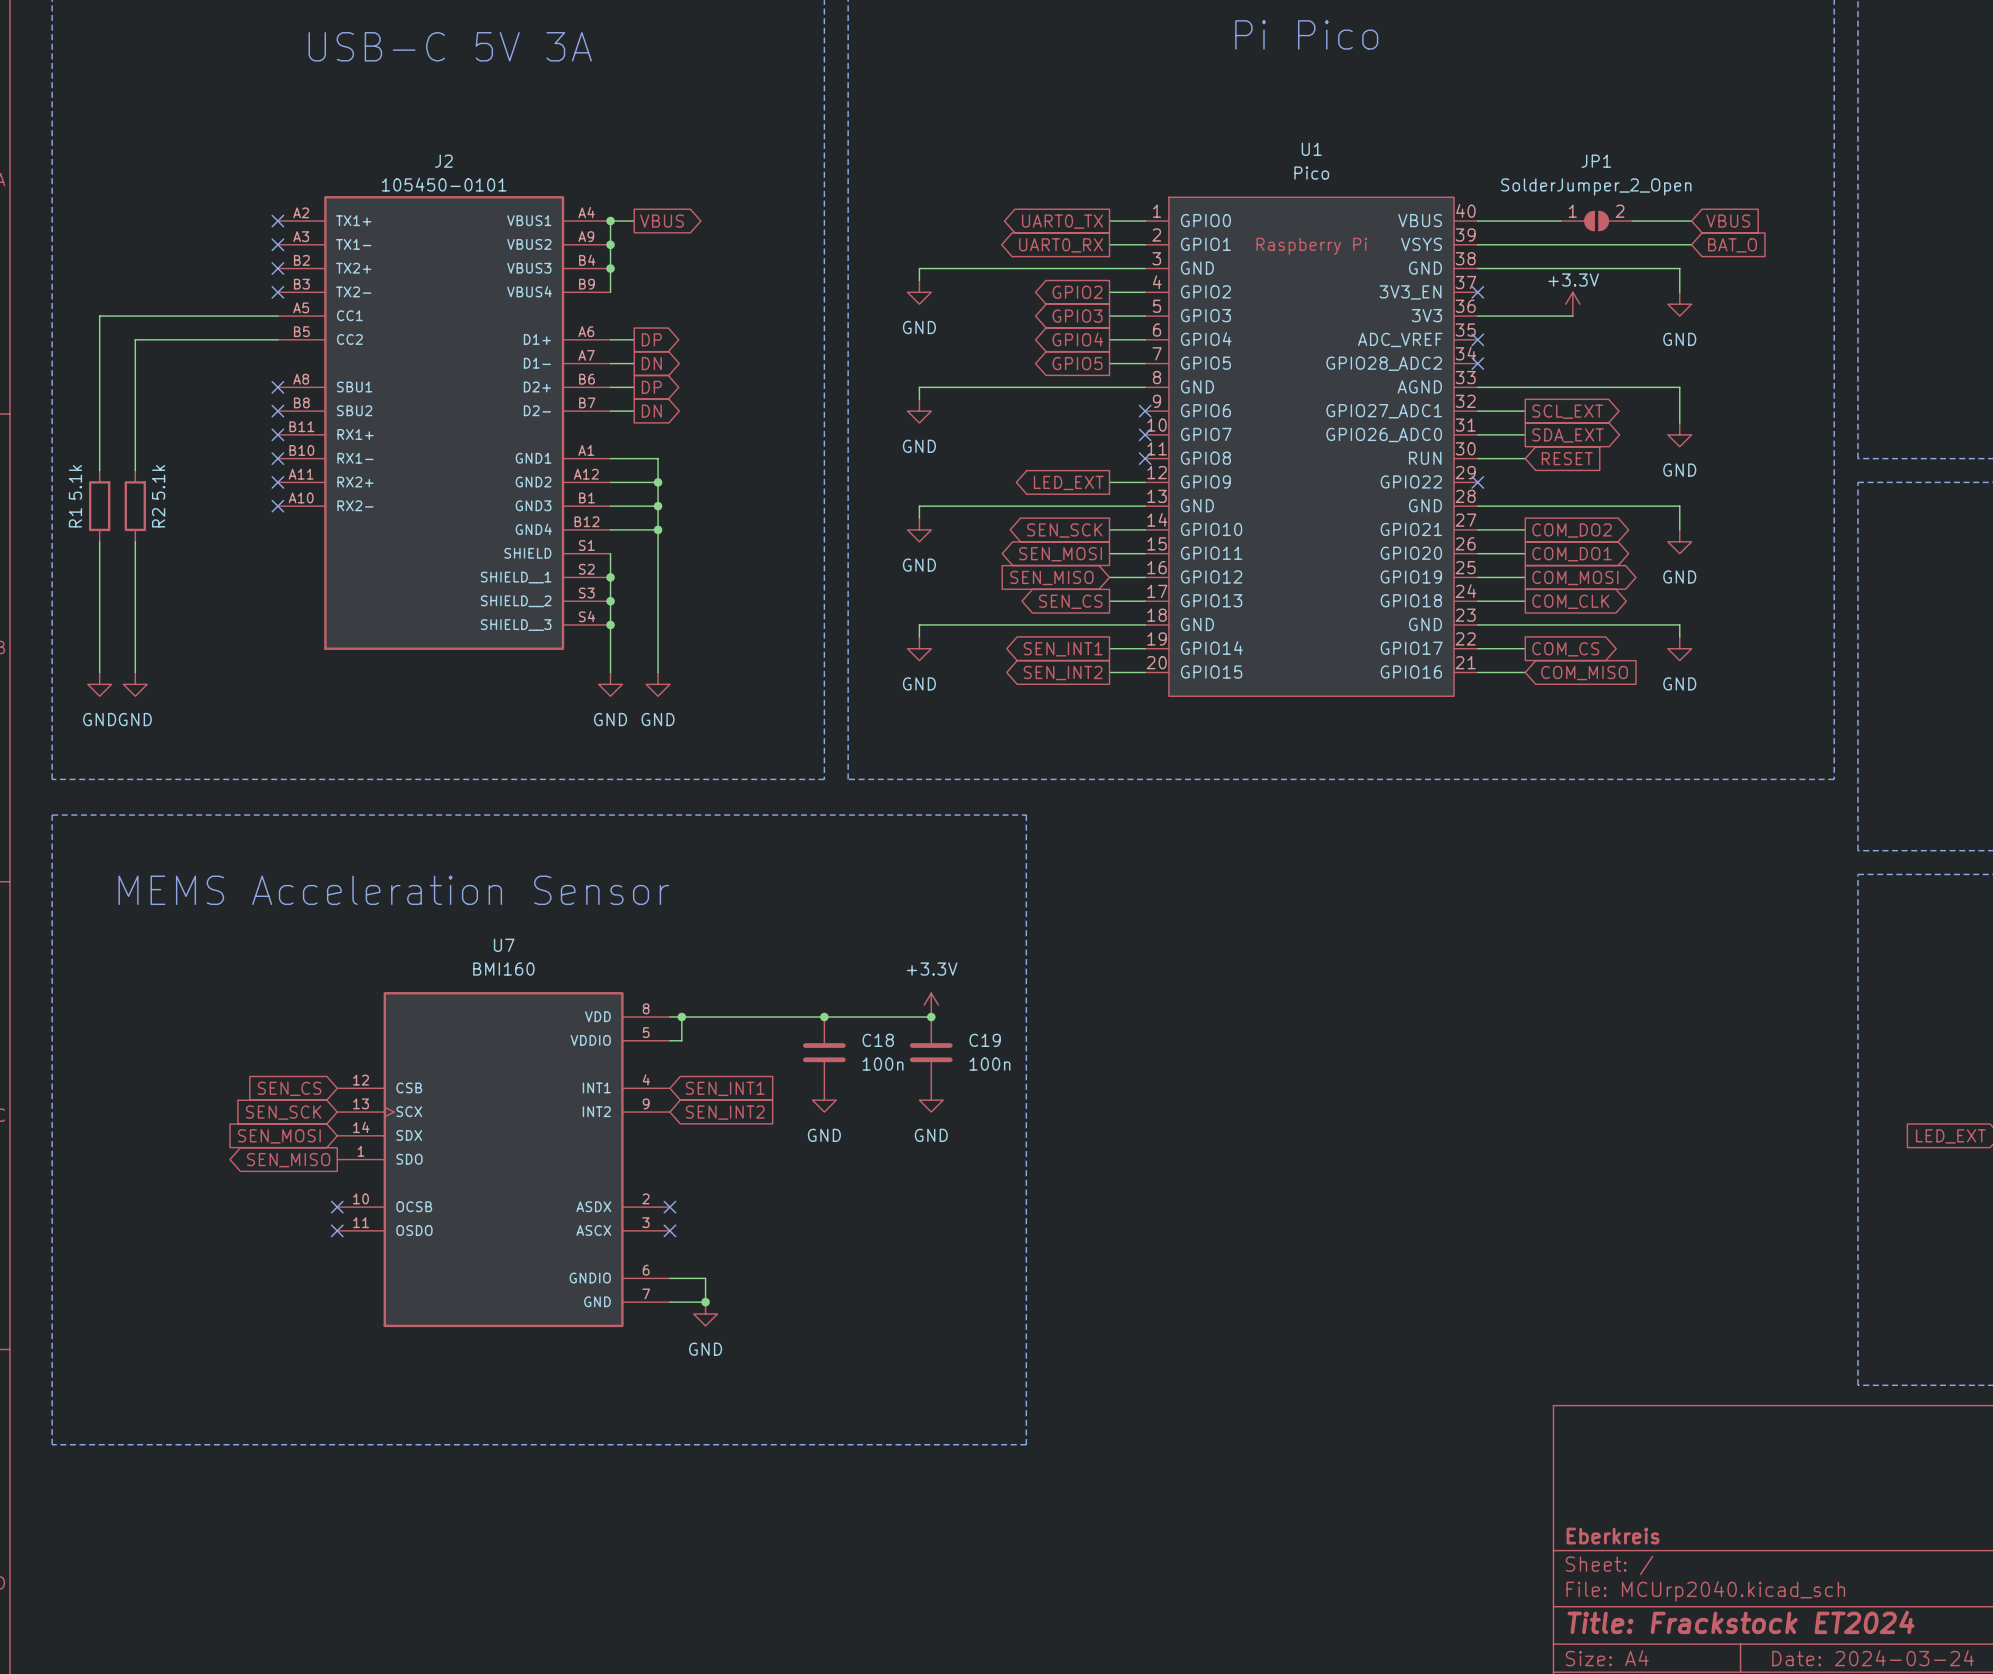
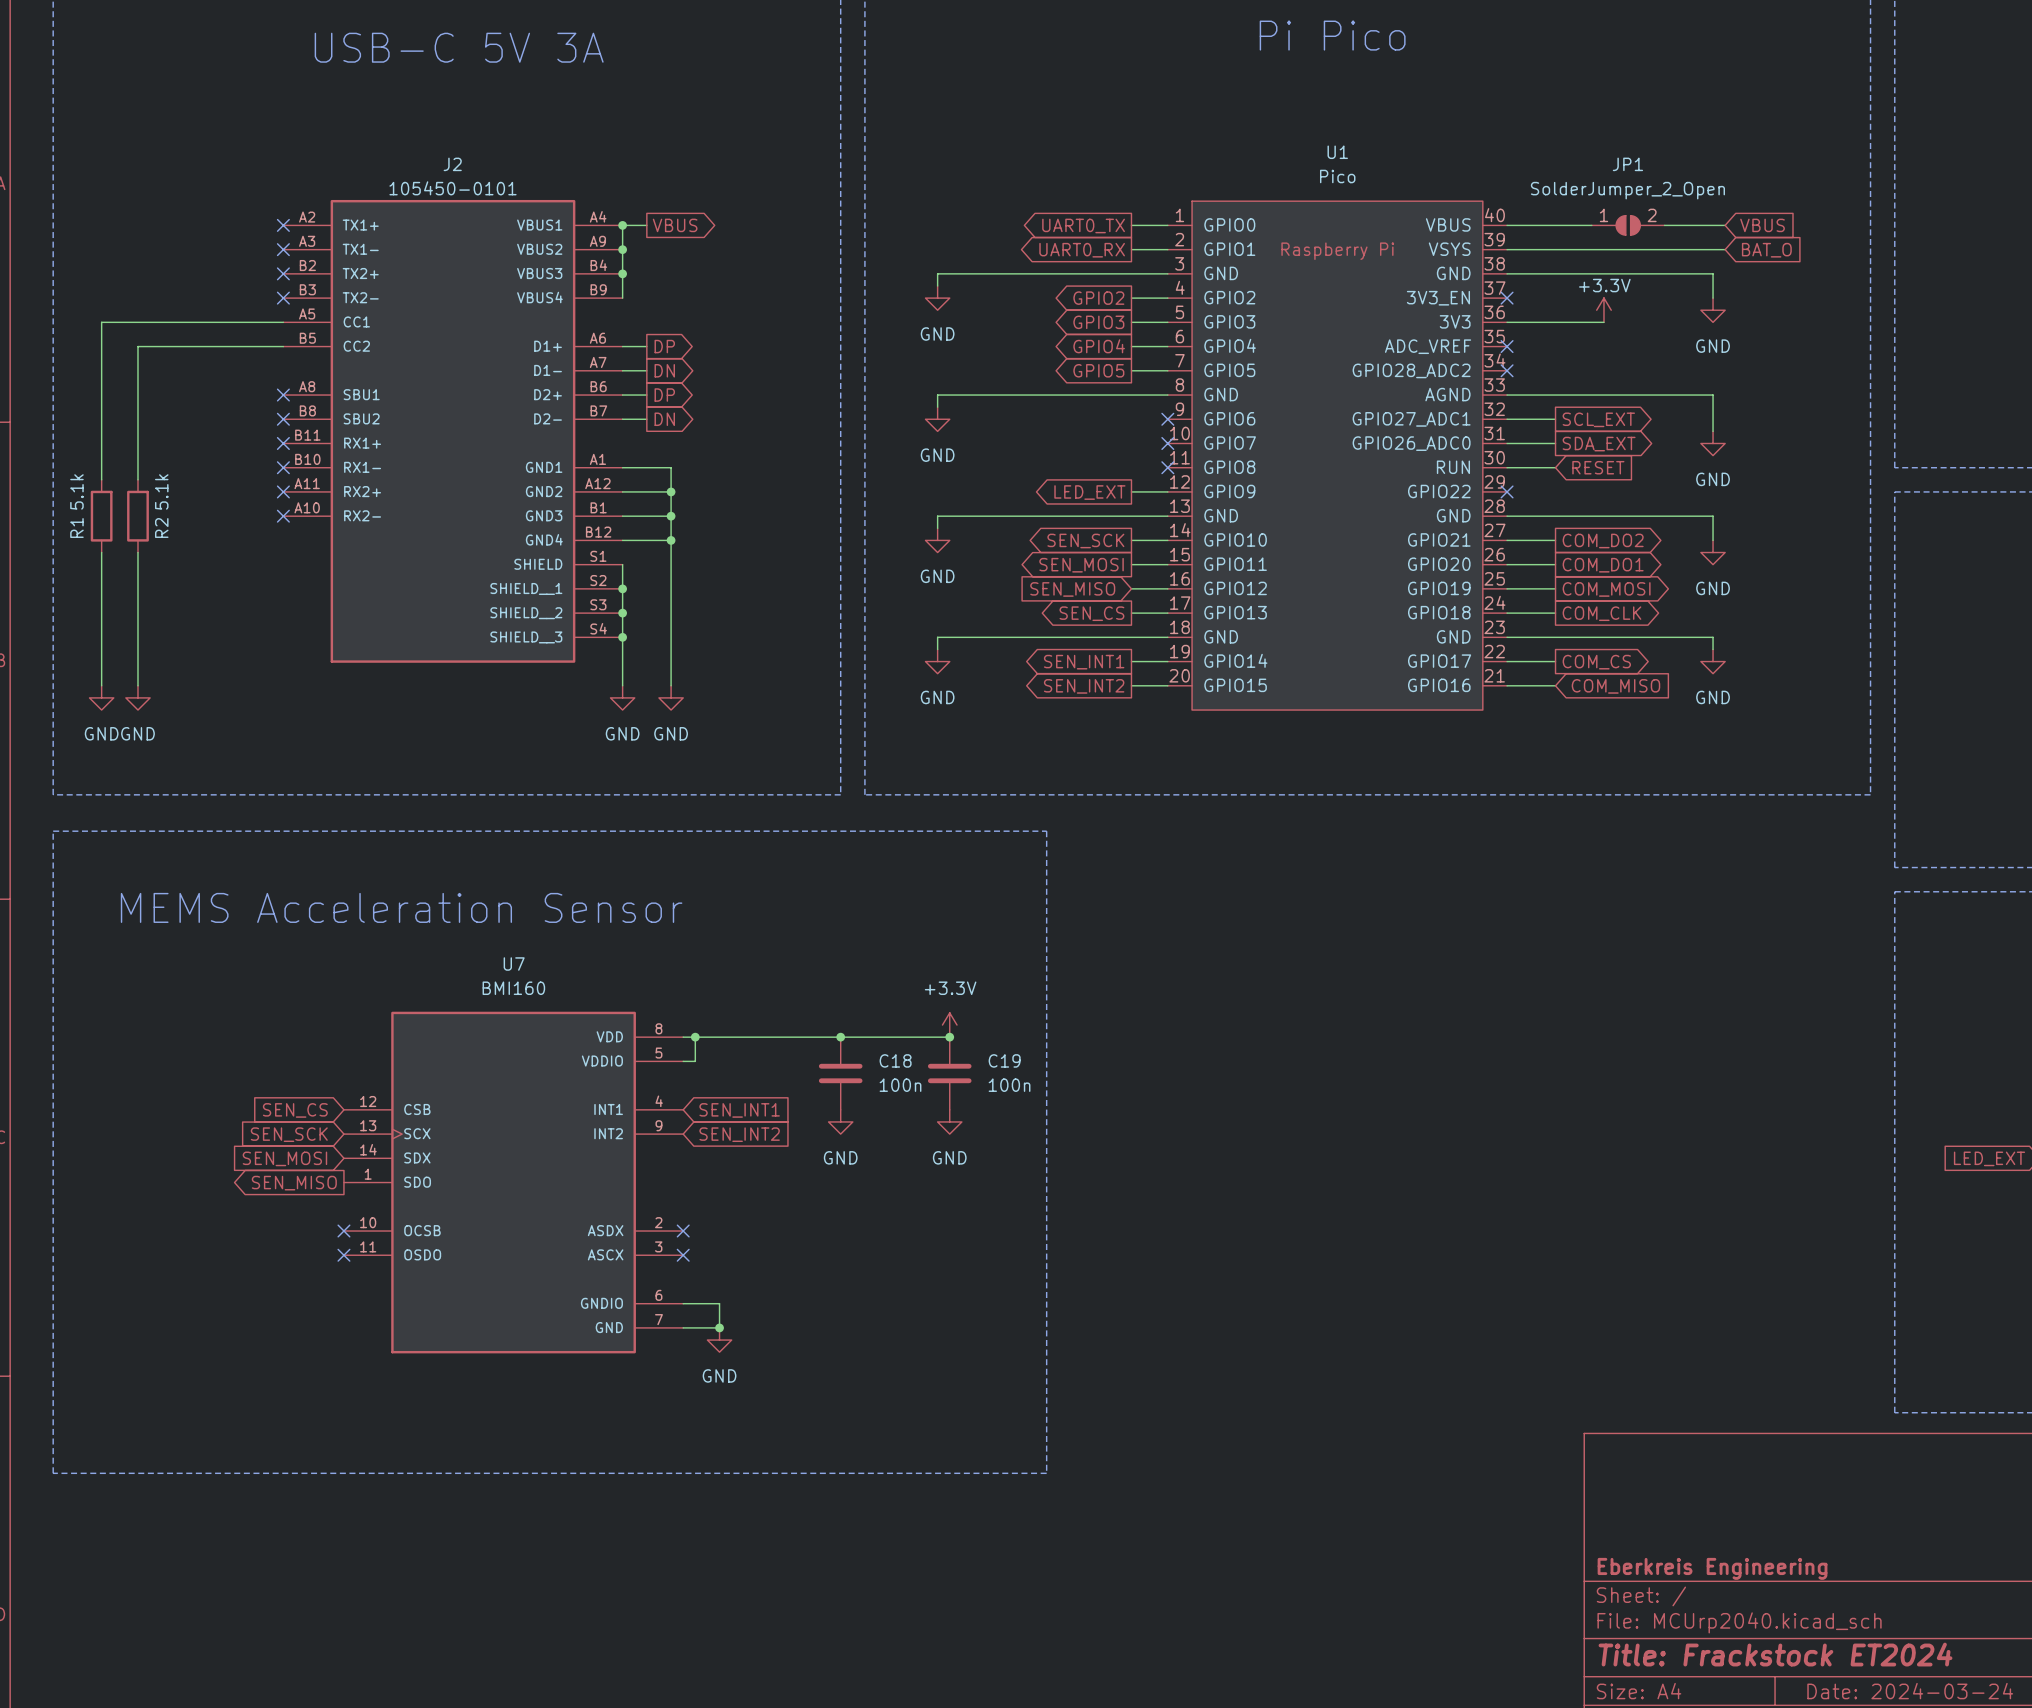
title block: Eberkreis (1613, 1536) -> Eberkreis Engineering (1712, 1568)

